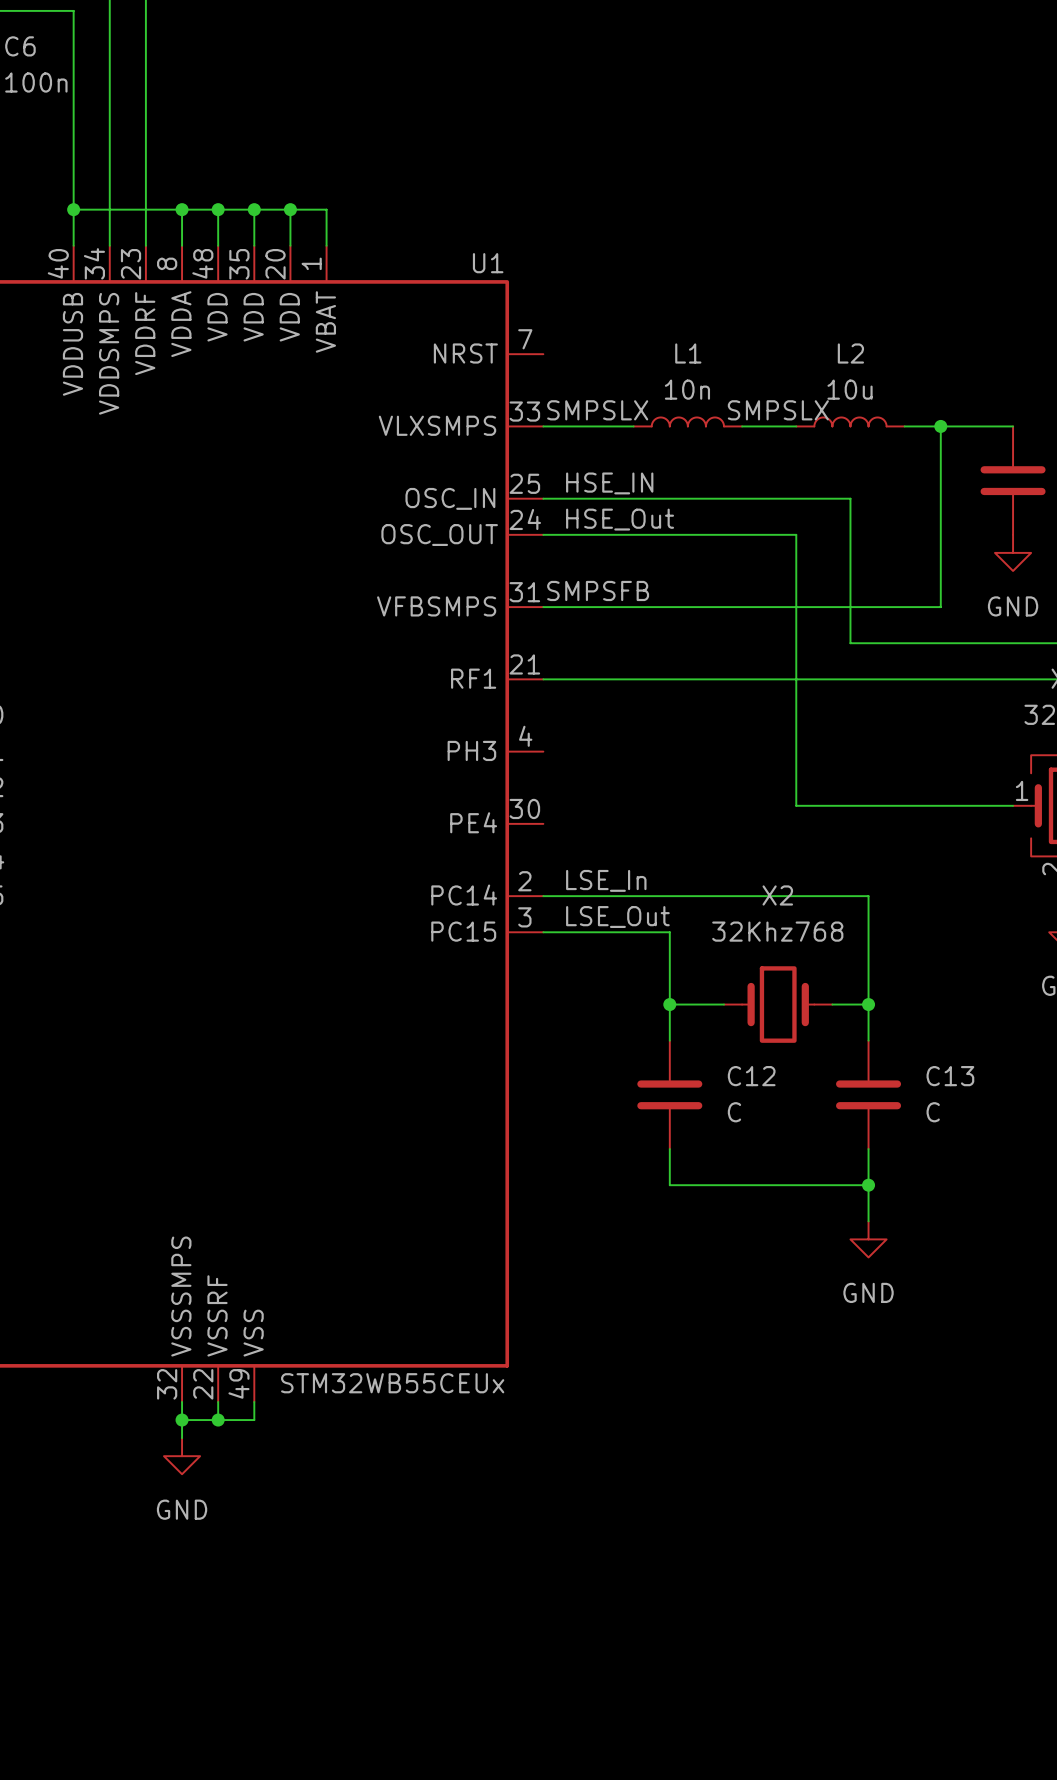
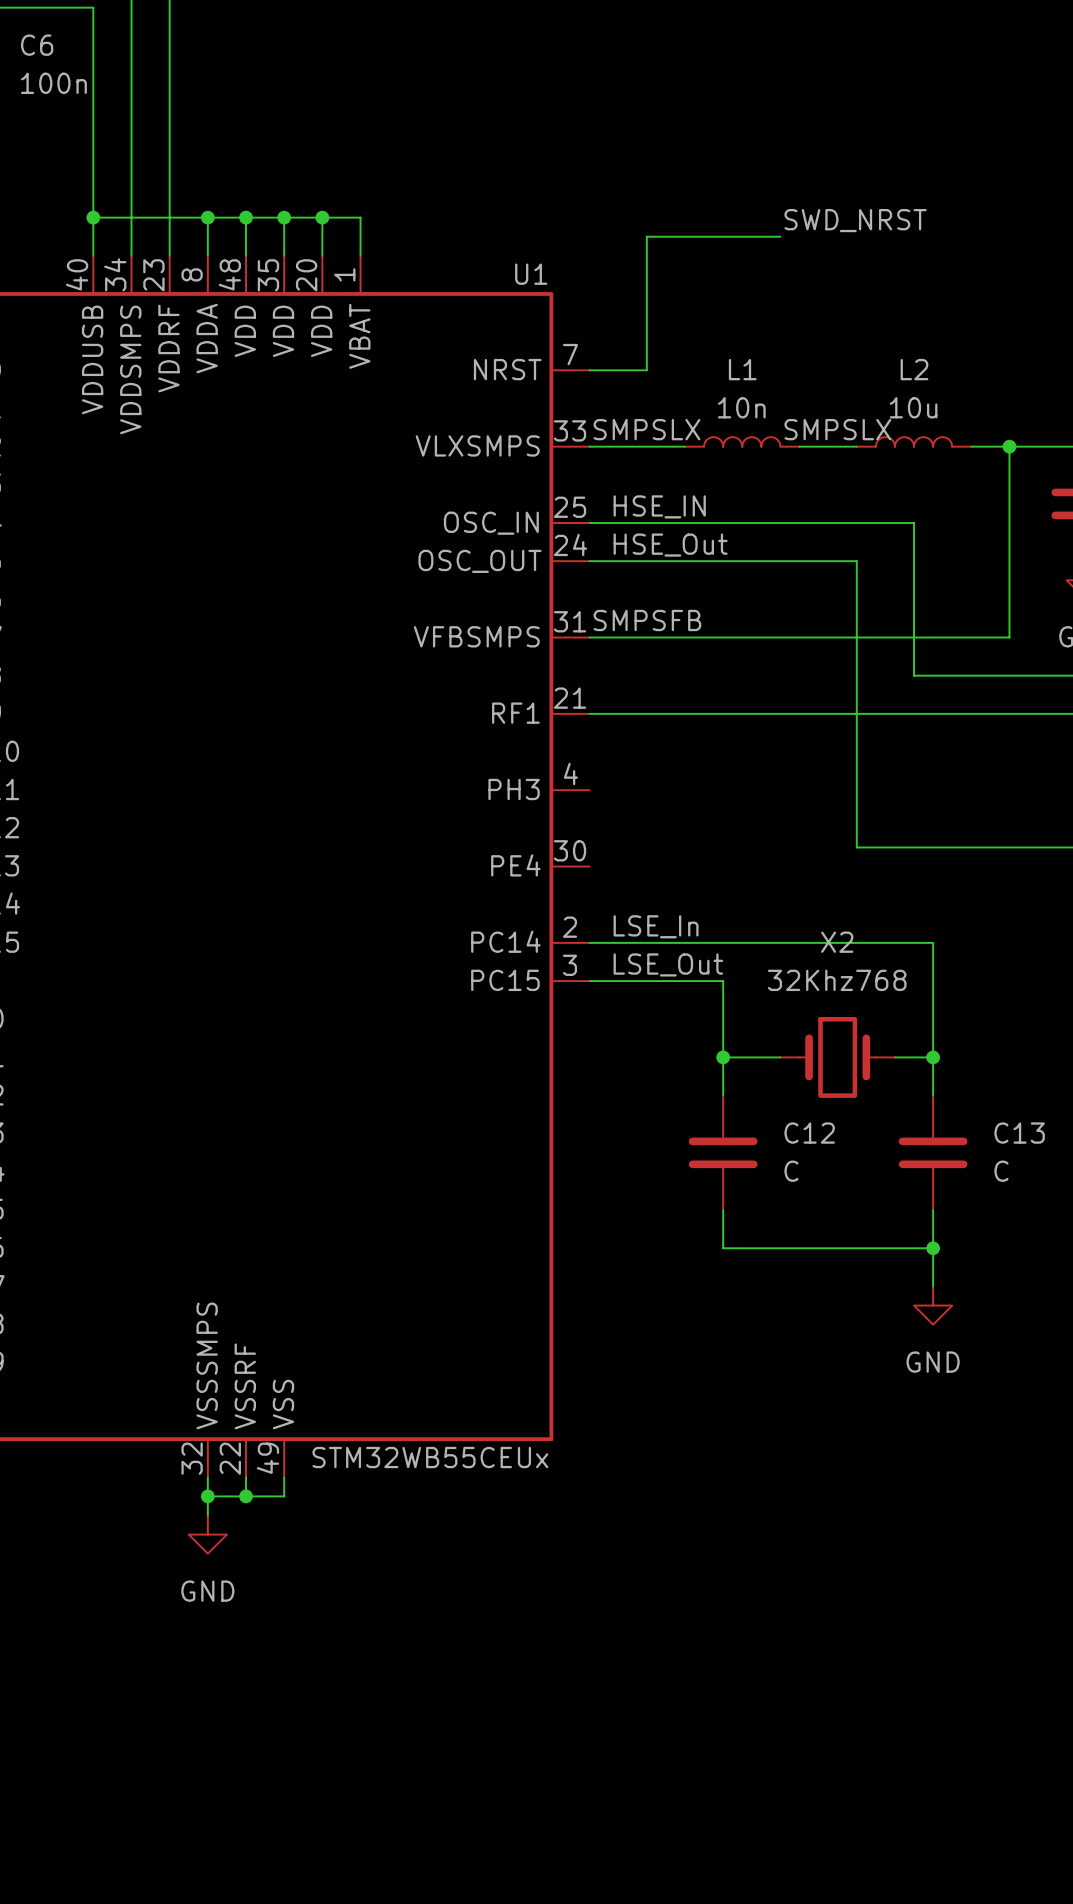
label: none -> SWD_NRST (855, 220)
wire: none -> (780, 236) (646, 236) (646, 370) (589, 370)

